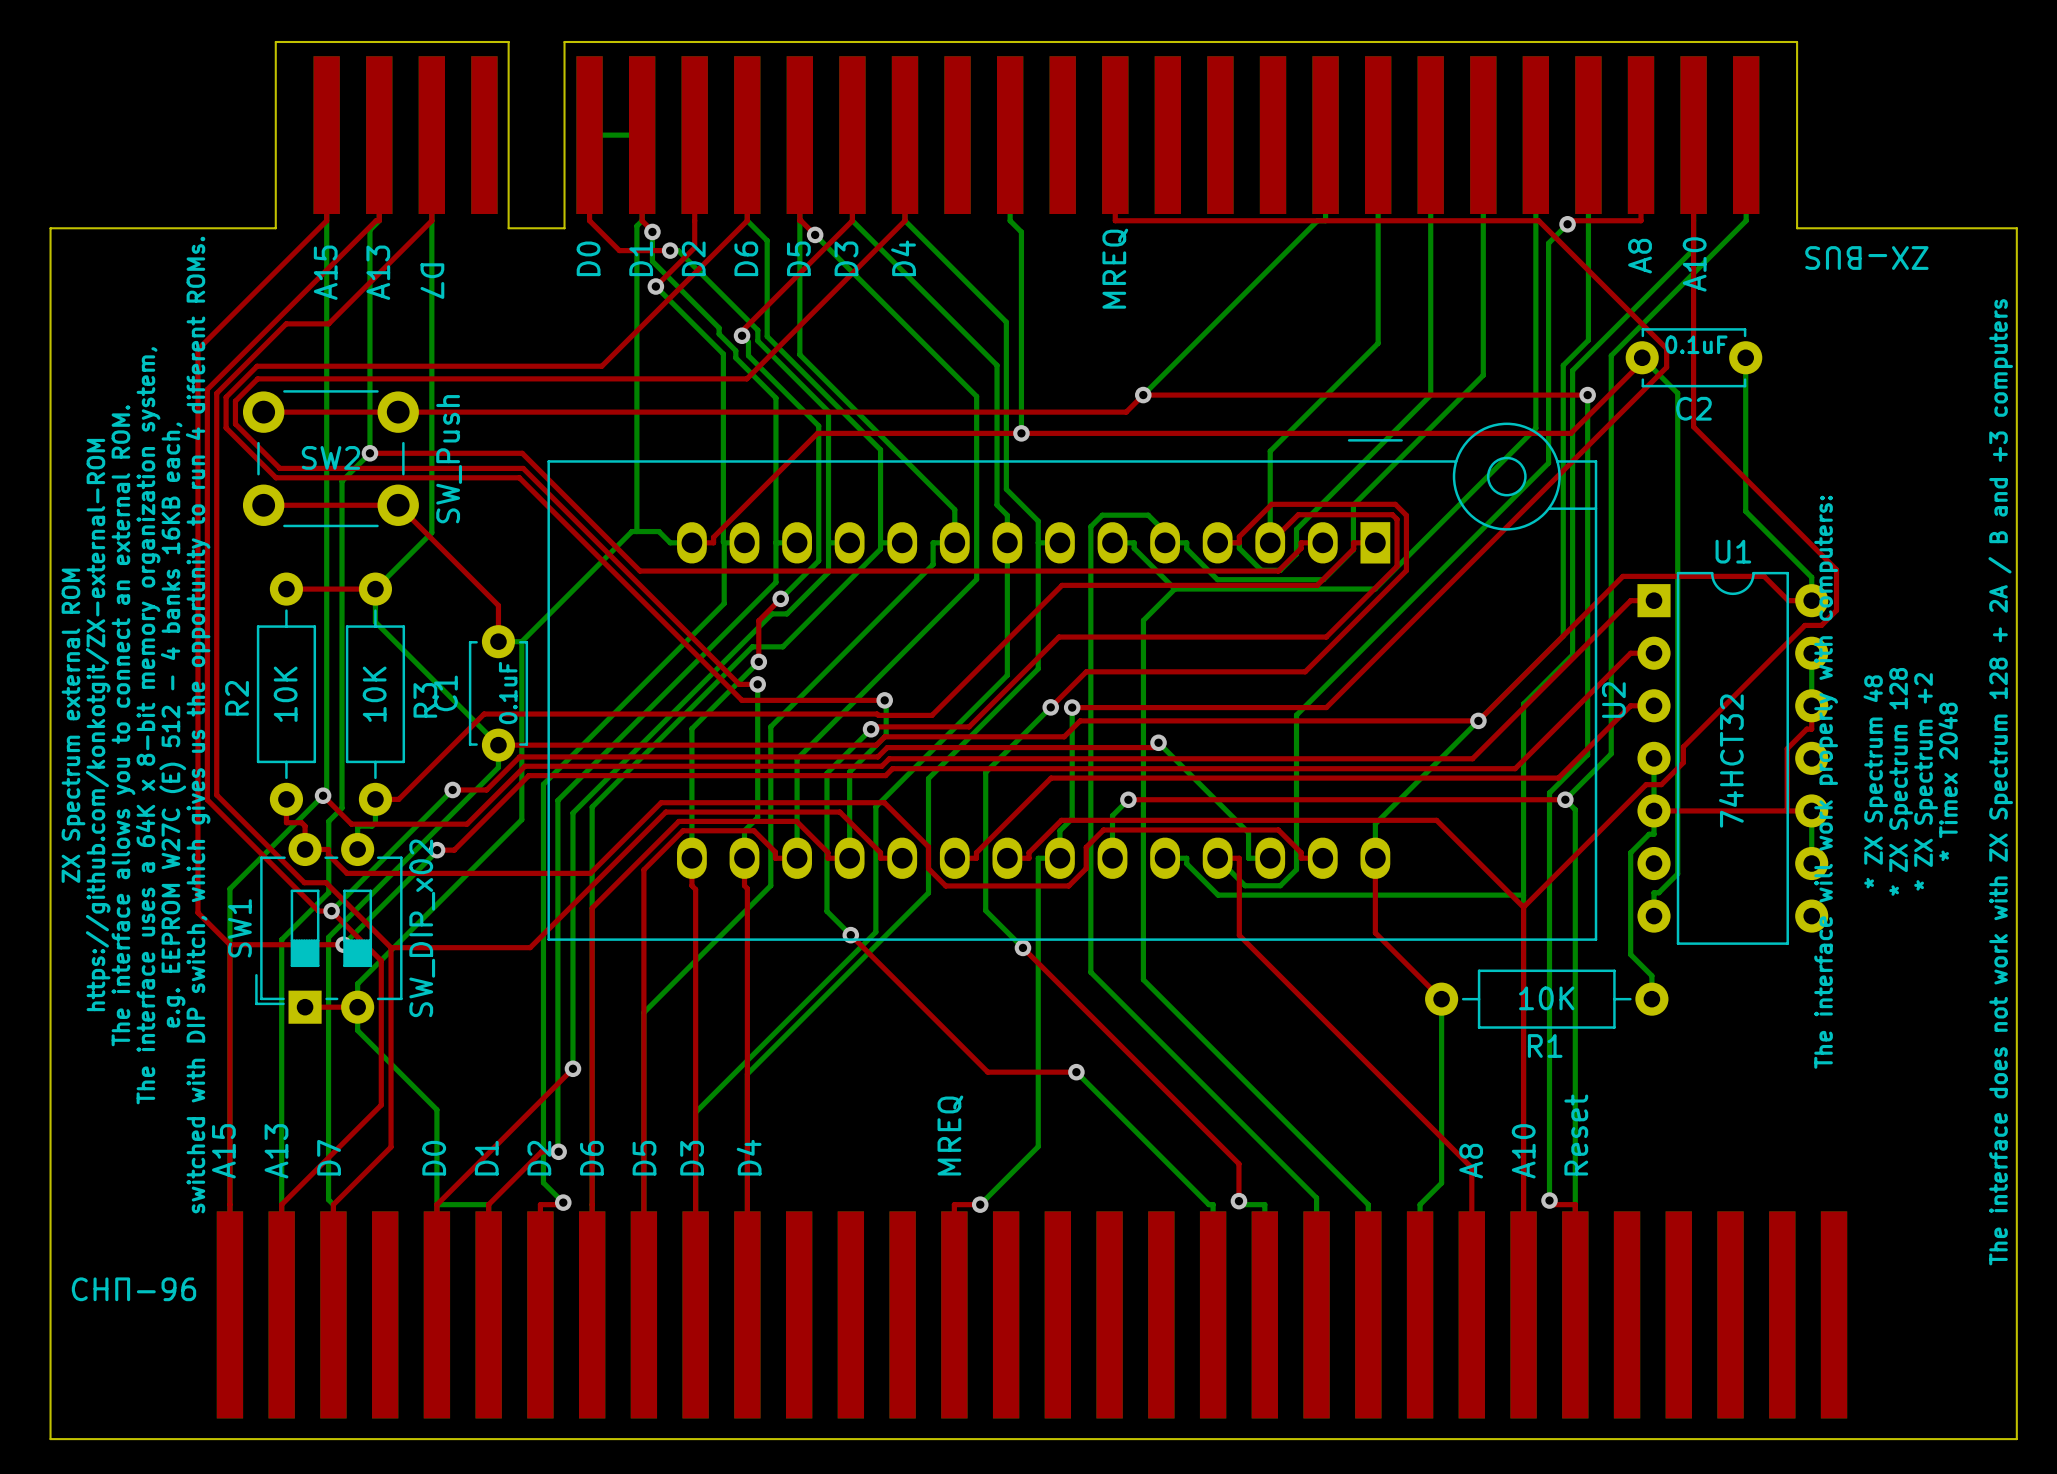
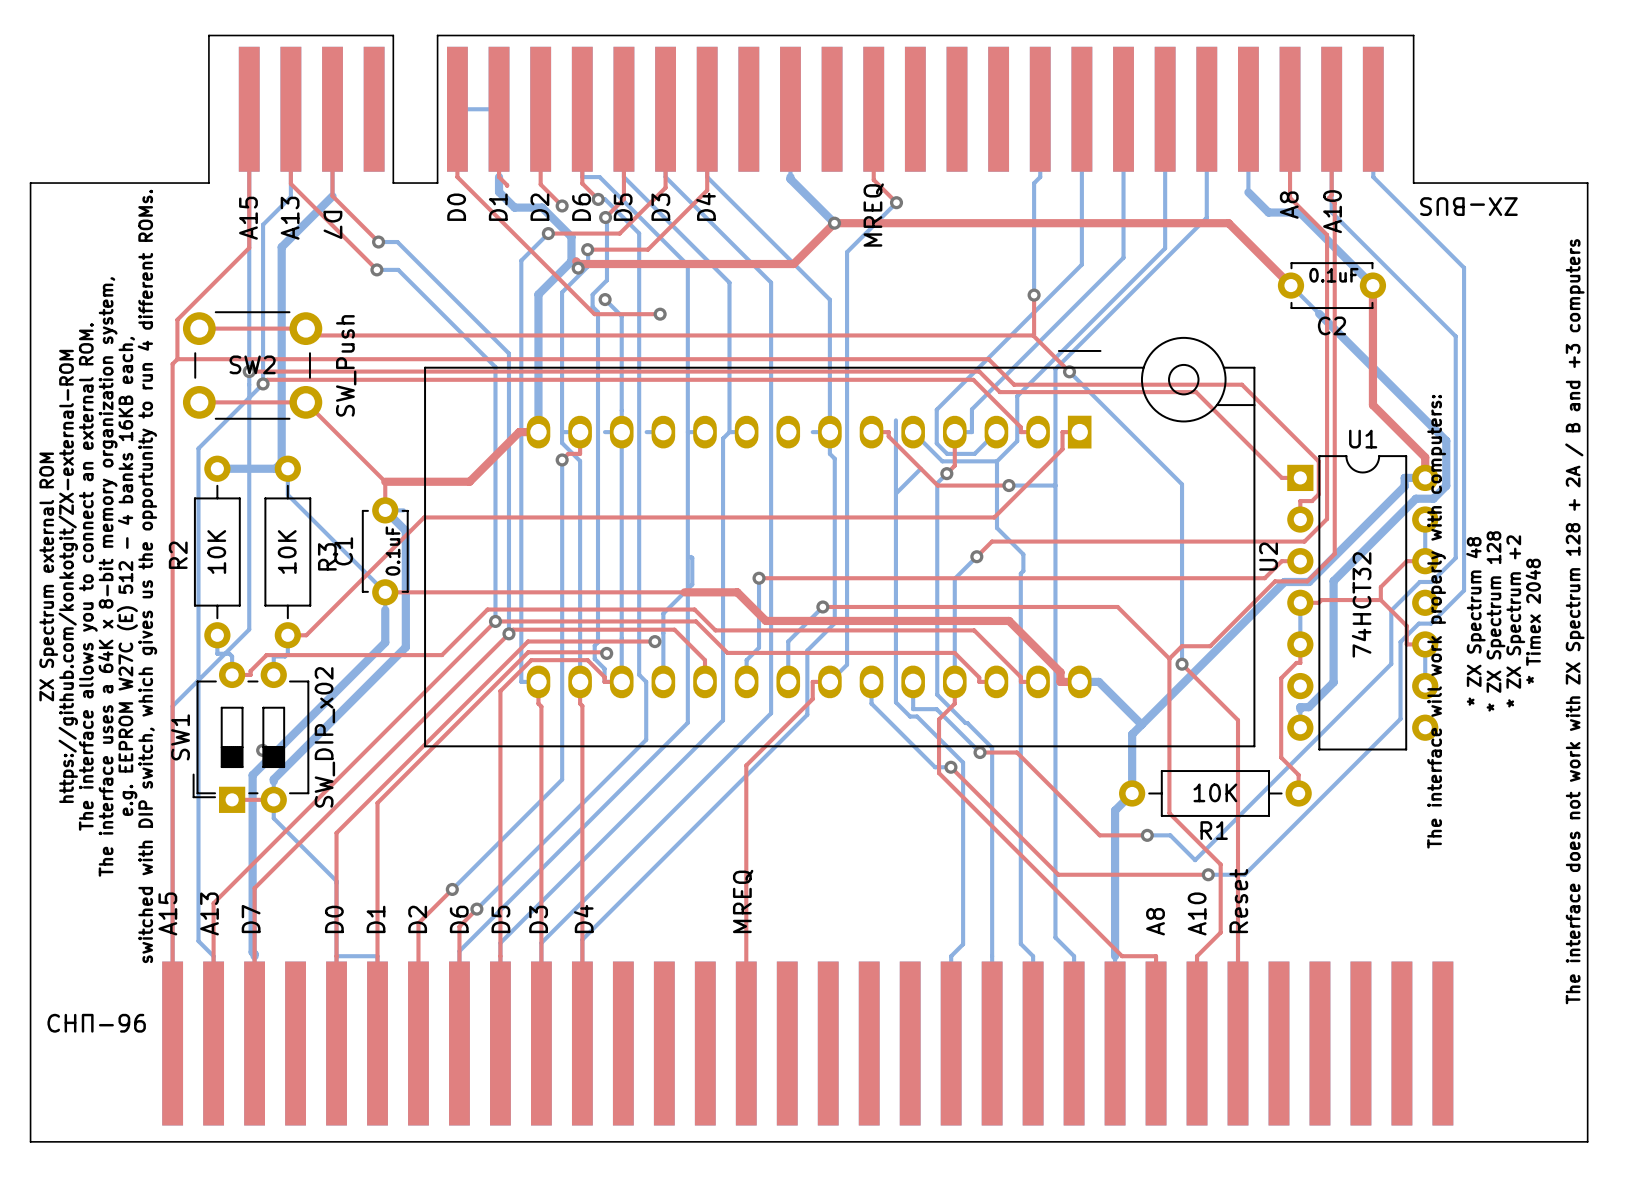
top track: (326, 220) (197, 349) (197, 912) (229, 944) (343, 944) -> (249, 177) (249, 247) (177, 319) (177, 359)
top track: (379, 220) (376, 220) (207, 389) (207, 799) (318, 911) (331, 911) (381, 960) (381, 1105) (281, 1204) -> (290, 177) (290, 183) (376, 269)
bottom track: (379, 220) (369, 230) (369, 453) (342, 481) (342, 808) (328, 821) (328, 892) (281, 939) (281, 1204) -> (290, 177) (290, 196) (263, 224) (263, 383) (198, 448) (198, 941) (213, 956)
top track: (431, 220) (328, 323) (286, 323) (216, 393) (216, 795) (304, 882) (326, 882) (391, 947) -> (332, 177) (332, 195) (378, 242)
bottom track: (642, 220) (636, 226) (636, 531) -> (499, 177) (499, 192) (514, 207) (542, 207) (571, 236) (571, 261)
top track: (747, 220) (601, 366) (257, 366) (226, 397) (226, 427) (275, 477) (519, 477) (741, 700) (884, 700) -> (582, 177) (582, 183) (598, 199)
bottom track: (747, 220) (767, 240) (767, 336) (880, 449) -> (582, 177) (599, 177) (687, 265) (687, 358)
top track: (799, 220) (815, 234) -> (623, 177) (623, 199) (605, 217)
bottom track: (799, 220) (799, 354) (954, 509) (954, 542) -> none
top track: (852, 220) (742, 331) (742, 335) -> (665, 177) (665, 187) (619, 233) (548, 233)
top track: (905, 220) (746, 378) (257, 378) (235, 401) (235, 424) (279, 468) (523, 468) (739, 684) (757, 684) -> (707, 177) (707, 190) (647, 249) (587, 249)
bottom track: (1010, 220) (1021, 232) (1021, 433) -> (790, 177) (834, 223)
top track: (1115, 220) (1538, 220) (1666, 348) (1666, 367) (1326, 707) (1072, 707) -> (873, 177) (873, 179) (896, 202)
bottom track: (1325, 220) (1317, 220) (1143, 395) -> (1040, 177) (1034, 183) (1034, 295)
top track: (1641, 220) (1571, 220) (1567, 224) -> (1290, 177) (1290, 197) (1327, 234) (1327, 519) (1304, 541) (991, 541) (976, 556)
bottom track: (1746, 220) (1611, 355) (1611, 753) (1565, 799) (1575, 809) (1575, 1101) -> (1373, 177) (1464, 267) (1464, 590) (1430, 623) (1418, 623) (1400, 641) (1400, 718) (1244, 874) (1208, 874)
bottom track: (1567, 224) (1548, 243) (1548, 463) (1296, 715) (1296, 869) (1280, 885) (1245, 885) (1217, 858) -> (976, 556) (954, 578) (954, 681)
via: (1567, 224) -> none
top track: (694, 230) (694, 247) (655, 286) -> (540, 184) (562, 205)
bottom track: (652, 231) (652, 261) (719, 328) (719, 334) (735, 350) (735, 357) (775, 398) (775, 582) (557, 800) (558, 1151) -> none
via: (652, 231) -> none
bottom track: (815, 234) (976, 396) (976, 579) (797, 758) -> (605, 299) (621, 316) (621, 603)
via: (815, 234) -> none
bottom track: (1588, 240) (1588, 340) (1563, 365) (1563, 636) (1375, 823) (1375, 858) -> (1141, 724) (1098, 681) (1079, 681)
top track: (1693, 243) (1693, 426) (1836, 569) (1836, 610) (1821, 625) (1804, 625) (1683, 747) (1683, 762) (1661, 784) (1646, 784) (1523, 907) -> (1331, 195) (1329, 197) (1334, 203) (1334, 554) (1307, 581) (1275, 581) (1210, 646) (1181, 646) (1169, 658)
bottom track: (431, 245) (431, 532) (375, 589) -> (332, 196) (281, 247) (281, 462)
bottom track: none -> (598, 199) (605, 199) (639, 233) (639, 674) (646, 681) (646, 739) (476, 909)
via: none -> (598, 199)
bottom track: (1693, 249) (1572, 370) (1572, 654) (1523, 703) (1523, 1204) -> (1331, 199) (1331, 212) (1455, 336) (1455, 558) (1431, 581) (1419, 581) (1391, 610) (1391, 664) (1195, 860) (1170, 835) (1147, 835)
top track: (619, 250) (670, 250) -> (481, 200) (594, 314) (660, 314)
bottom track: (670, 250) (678, 250) (757, 330) (757, 340) (828, 411) (828, 572) (786, 613) (772, 613) (572, 813) (572, 1068) -> none
via: (670, 250) -> none
bottom track: none -> (896, 202) (847, 252) (847, 664) (829, 681)
via: none -> (896, 202)
via: none -> (562, 205)
bottom track: none -> (605, 217) (606, 280) (592, 294) (592, 306) (598, 312) (598, 642) (594, 645) (594, 658) (604, 668) (604, 681) (621, 681)
via: none -> (605, 217)
bottom track: (1535, 272) (1535, 428) (1375, 589) (1174, 589) (1134, 548) (1134, 542) (1112, 542) -> (1206, 217) (1055, 369) (1055, 937)
via: none -> (834, 223)
bottom track: (655, 286) (723, 354) (724, 603) (543, 784) (543, 1182) (563, 1202) -> none
via: (655, 286) -> none
via: none -> (548, 233)
bottom track: none -> (378, 242) (397, 242) (508, 353) (508, 633)
via: none -> (378, 242)
bottom track: (1483, 310) (1483, 375) (1353, 505) (1353, 549) (1323, 579) (1270, 579) -> none
via: none -> (587, 249)
bottom track: (1006, 322) (1006, 489) (1038, 521) (1038, 668) (928, 778) (928, 892) (747, 1074) (747, 1183) -> (787, 257) (829, 299) (829, 453) (834, 458) (834, 623) (807, 650) (807, 714) (582, 939)
bottom track: (1430, 322) (1430, 395) (1296, 529) -> (1165, 248) (1017, 396) (1017, 421)
bottom track: none -> (571, 261) (538, 294) (538, 432)
bottom track: (1378, 331) (1378, 343) (1270, 451) (1270, 542) -> (1081, 264) (936, 409) (936, 443) (947, 453) (974, 453) (996, 432)
bottom track: (742, 335) (748, 342) (748, 355) (818, 425) (818, 560) (780, 598) -> none
bottom track: none -> (376, 269) (398, 269) (495, 367) (495, 621)
via: none -> (376, 269)
bottom track: (985, 354) (997, 365) (997, 505) (1007, 515) (1007, 675) (875, 806) (875, 932) (695, 1112) (695, 1187) -> none
top track: (1642, 357) (1642, 362) (1570, 433) (817, 433) (713, 537) (713, 542) (691, 542) -> (1291, 285) (1228, 223) (834, 223) (793, 264) (578, 264) (576, 261)
top track: none -> (1372, 285) (1372, 405) (1425, 457) (1425, 477)
bottom track: (1745, 357) (1745, 511) (1811, 577) (1811, 600) -> (1372, 285) (1299, 212) (1268, 212) (1248, 192)
top track: none -> (1034, 295) (1033, 335)
via: none -> (1034, 295)
via: none -> (605, 299)
via: none -> (660, 314)
bottom track: (1677, 393) (1677, 873) (1658, 892) (1654, 892) -> (1319, 313) (1446, 440) (1446, 485) (1433, 498) (1415, 498) (1333, 581) (1333, 682) (1308, 707) (1300, 707) (1300, 709)
via: (1143, 395) -> none
top track: (1587, 395) (1143, 395) (1126, 412) (398, 412) -> (1033, 335) (312, 335) (305, 328)
bottom track: (1587, 395) (1587, 754) (1549, 792) (1549, 1200) -> none
via: (1587, 395) -> none
top track: none -> (1033, 335) (1069, 371)
via: (1021, 433) -> none
top track: none -> (177, 359) (172, 363) (172, 750)
top track: (369, 453) (522, 453) (640, 571) (1278, 571) (1301, 548) (1301, 542) -> (263, 383) (267, 379) (973, 379) (1020, 427) (1020, 432)
via: (369, 453) -> none
via: none -> (249, 371)
bottom track: none -> (1069, 371) (1182, 484) (1182, 664)
via: none -> (1069, 371)
via: none -> (263, 383)
top track: none -> (538, 432) (519, 432) (469, 481) (385, 481)
bottom track: (691, 542) (670, 542) (658, 531) (631, 531) (521, 641) (521, 819) (357, 983) -> (385, 510) (405, 530) (405, 647) (273, 781)
top track: none -> (580, 432) (580, 453) (568, 453) (562, 459)
bottom track: (933, 542) (933, 564) (770, 726) (770, 885) (643, 1012) (643, 1187) -> (623, 177) (729, 282) (729, 432) (723, 438) (723, 720) (500, 942)
top track: none -> (871, 432) (888, 432) (888, 436) (937, 485) (1008, 485)
bottom track: (1165, 542) (1186, 542) (1186, 548) (1217, 579) -> (913, 432) (942, 461) (954, 461)
bottom track: (1175, 542) (1148, 515) (1102, 515) (1090, 526) (1090, 972) (1316, 1198) (1316, 1204) -> (1004, 453) (997, 461) (997, 528) (1023, 554) (1023, 571) (1020, 573) (1020, 943) (1033, 956)
top track: (1217, 542) (1239, 542) (1239, 536) (1271, 504) (1395, 504) (1406, 515) (1406, 570) (1305, 671) (1086, 671) (1050, 707) -> (954, 432) (954, 465) (946, 473)
bottom track: (1239, 542) (1239, 548) (1261, 570) (1280, 570) -> (971, 432) (971, 409) (1123, 257)
top track: (1270, 542) (1298, 514) (1392, 514) (1397, 519) (1397, 566) (1326, 637) (1058, 637) (969, 726) (873, 726) (871, 729) -> none
top track: (1353, 548) (1317, 585) (1062, 585) (931, 715) (484, 714) -> (1062, 436) (1062, 449) (994, 517) (424, 517) (373, 567)
bottom track: (880, 549) (782, 646) (752, 646) (592, 807) (592, 1198) -> (687, 437) (687, 722) (459, 951)
bottom track: none -> (562, 459) (562, 779) (452, 889)
via: none -> (562, 459)
bottom track: none -> (281, 462) (275, 468) (217, 468)
top track: (286, 589) (375, 589) -> none
via: none -> (946, 473)
top track: (780, 598) (758, 620) (758, 661) -> none
via: (780, 598) -> none
top track: (1630, 600) (1472, 758) (889, 758) (881, 766) (524, 766) (467, 824) (351, 824) (323, 795) -> (1281, 477) (1196, 392) (999, 392) (979, 371) (249, 371)
top track: (1811, 600) (1788, 600) (1764, 576) (1622, 576) (1478, 720) (1080, 720) (1064, 736) (884, 736) (876, 745) -> (1079, 681) (1060, 681) (1060, 672) (1009, 620) (765, 620) (737, 592) (684, 592)
bottom track: none -> (1008, 485) (1055, 485)
via: none -> (1008, 485)
top track: (1654, 653) (1630, 653) (1515, 768) (892, 768) (885, 775) (528, 775) (454, 850) (437, 850) -> (1300, 519) (1300, 501) (1312, 501) (1318, 494) (1318, 461) (1242, 384) (1014, 384) (988, 359) (177, 359)
bottom track: (758, 661) (691, 728) (691, 858) -> (548, 233) (521, 260) (521, 681) (538, 681)
via: (758, 661) -> none
bottom track: (757, 684) (757, 817) (744, 830) -> (587, 249) (588, 266) (562, 292) (562, 443) (580, 461) (580, 660)
via: (757, 684) -> none
via: (884, 700) -> none
via: none -> (976, 556)
top track: (1811, 705) (1811, 729) (1806, 729) (1787, 748) (1787, 810) -> (1425, 561) (1406, 561) (1380, 587) (1380, 600)
bottom track: (1050, 707) (985, 772) -> (771, 282) (771, 613)
via: (1050, 707) -> none
bottom track: (1072, 707) (1072, 818) (1059, 830) (1059, 858) (1038, 858) (1038, 1146) (980, 1204) -> none
via: (1072, 707) -> none
via: (1478, 720) -> none
bottom track: none -> (759, 578) (759, 647) (746, 660) (746, 681)
via: none -> (759, 578)
top track: (1609, 727) (1558, 778) (1051, 778) (976, 852) (976, 858) (954, 858) -> (1264, 578) (759, 578)
bottom track: (871, 729) (826, 773) (826, 911) (850, 935) -> none
via: (871, 729) -> none
top track: (1158, 742) (1153, 747) (887, 747) (877, 756) (519, 756) (486, 789) (452, 789) -> none
bottom track: (1158, 742) (1248, 832) (1248, 858) (1270, 858) -> none
via: (1158, 742) -> none
top track: none -> (1380, 600) (1321, 600) (1318, 602) (1300, 602)
top track: none -> (822, 606) (1117, 606) (1169, 658)
bottom track: none -> (822, 606) (788, 641) (788, 681)
via: none -> (822, 606)
bottom track: (498, 767) (328, 937) (328, 1199) (333, 1204) -> (385, 610) (385, 642) (252, 775) (252, 952) (254, 956)
via: none -> (495, 621)
bottom track: (452, 789) (331, 911) -> none
via: (452, 789) -> none
via: (323, 795) -> none
via: none -> (508, 633)
top track: (286, 799) (286, 822) (301, 822) (305, 826) (305, 849) -> none
bottom track: none -> (217, 635) (217, 653) (229, 653) (232, 656) (232, 674)
top track: (1128, 799) (1565, 799) -> none
bottom track: (1128, 799) (1112, 815) (1112, 858) -> (950, 767) (935, 767) (871, 703) (871, 681)
via: (1128, 799) -> none
via: (1565, 799) -> none
via: none -> (654, 641)
top track: (1654, 810) (1788, 810) -> (1380, 600) (1406, 625) (1406, 644)
top track: none -> (1300, 644) (1300, 662) (1296, 662) (1281, 678) (1281, 757) (1298, 775) (1298, 793)
bottom track: (1654, 810) (1654, 834) (1649, 834) (1630, 852) (1630, 954) (1651, 975) (1651, 999) -> none
via: none -> (606, 653)
via: none -> (1182, 664)
top track: (328, 849) (328, 854) (347, 873) (590, 873) (661, 802) (884, 802) (928, 846) (928, 868) (945, 885) (1068, 885) (1086, 868) (1086, 847) (1103, 830) (1278, 830) (1301, 852) -> (250, 674) (250, 671) (266, 655) (441, 655) (487, 609) (694, 609) (715, 630) (974, 630) (1020, 677)
bottom track: (437, 850) (343, 944) -> none
via: (437, 850) -> none
top track: (849, 858) (827, 858) (827, 852) (796, 821) (678, 821) (592, 908) (592, 1167) -> (476, 909) (459, 926)
top track: (902, 858) (880, 858) (880, 852) (839, 812) (665, 812) (530, 947) (391, 947) -> (705, 681) (705, 660) (674, 629) (513, 629) (254, 888) (254, 956)
top track: (1007, 858) (1029, 858) (1029, 852) (1061, 820) (1436, 820) (1523, 907) -> none
bottom track: (1165, 858) (1186, 858) (1186, 863) (1218, 895) (1523, 895) -> (913, 681) (913, 709) (936, 709) (980, 752)
top track: (1217, 858) (1239, 858) (1239, 935) (1471, 1167) (1471, 1204) -> (954, 681) (954, 703) (939, 719) (939, 773) (1122, 956) (1156, 956)
top track: none -> (996, 681) (979, 681) (979, 677) (954, 652) (727, 652) (696, 621) (495, 621) (213, 903) (213, 956)
top track: (1375, 858) (1375, 932) (1441, 999) -> none
bottom track: (1143, 884) (1143, 979) (1344, 1181) -> (895, 702) (910, 716) (917, 716) (963, 762) (963, 944) (951, 956)
bottom track: (985, 897) (985, 910) (1022, 947) -> (771, 713) (541, 942)
top track: (1523, 907) (1523, 1204) -> (1169, 658) (1169, 813) (1220, 864) (1220, 932) (1197, 956)
via: (331, 911) -> none
top track: (850, 935) (987, 1072) (1076, 1072) -> none
via: (850, 935) -> none
top track: (391, 947) (391, 1147) (333, 1204) -> none
top track: (1022, 947) (1238, 1163) (1238, 1201) -> none
via: (1022, 947) -> none
top track: none -> (980, 752) (1016, 752) (1099, 835) (1147, 835)
via: none -> (980, 752)
top track: none -> (950, 767) (1058, 874) (1208, 874)
via: none -> (950, 767)
bottom track: (1441, 999) (1441, 1183) (1420, 1204) -> (1425, 477) (1404, 477) (1404, 486) (1309, 581) (1284, 581) (1132, 734) (1132, 793) (1115, 810) (1115, 956)
via: none -> (1147, 835)
top track: (572, 1068) (437, 1204) -> (654, 641) (528, 641) (336, 832) (336, 956)
via: (572, 1068) -> none
bottom track: (1076, 1072) (1208, 1204) (1213, 1204) -> none
via: (1076, 1072) -> none
via: none -> (1208, 874)
via: none -> (452, 889)
via: none -> (476, 909)
top track: (558, 1151) (541, 1151) (488, 1204) -> (606, 653) (528, 652) (377, 802) (377, 956)
via: (558, 1151) -> none
top track: (1549, 1200) (1553, 1204) (1575, 1204) -> (1182, 664) (1238, 720) (1238, 956)
via: (1549, 1200) -> none
bottom track: (1238, 1201) (1242, 1204) (1264, 1204) -> (946, 473) (937, 483) (937, 694) (992, 747) (992, 956)
via: (1238, 1201) -> none
top track: (563, 1202) (561, 1204) (540, 1204) -> (452, 889) (418, 923) (418, 956)
via: (563, 1202) -> none
top track: (954, 1204) (980, 1204) -> (746, 956) (746, 765) (812, 699) (812, 681) (829, 681)
via: (980, 1204) -> none

